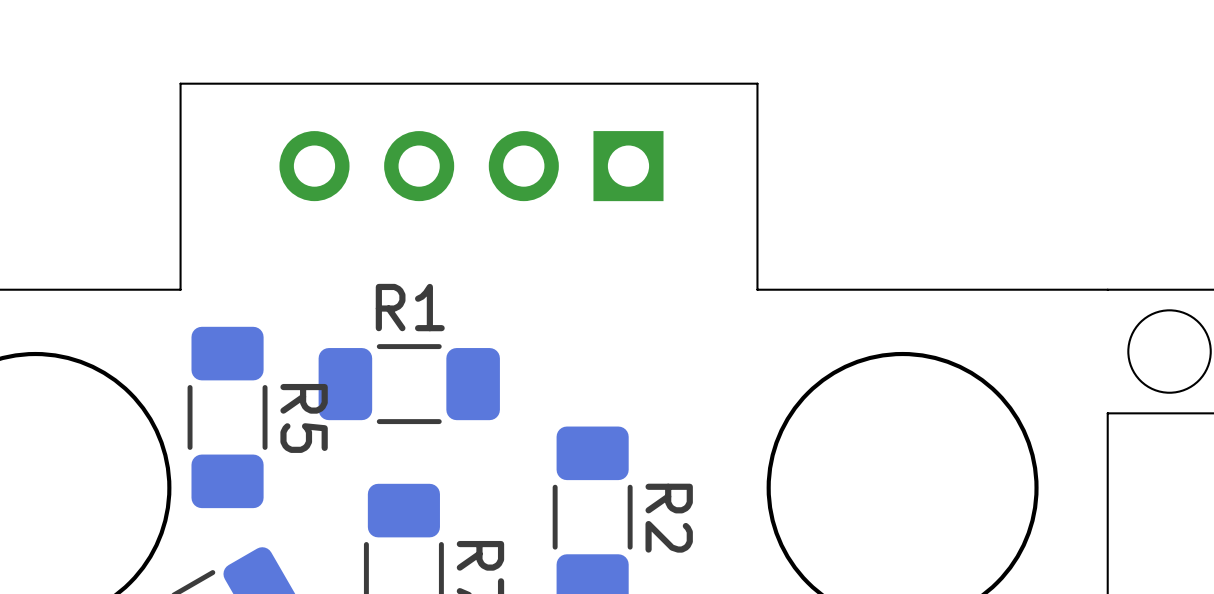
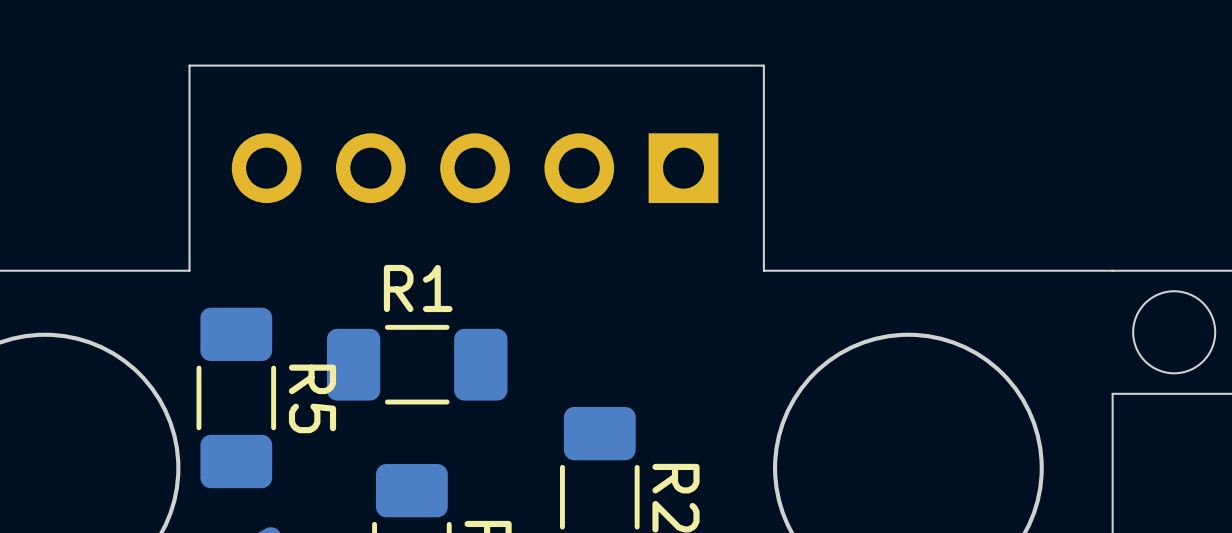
part footprint: [279, 131, 664, 202] -> [231, 133, 719, 204]

